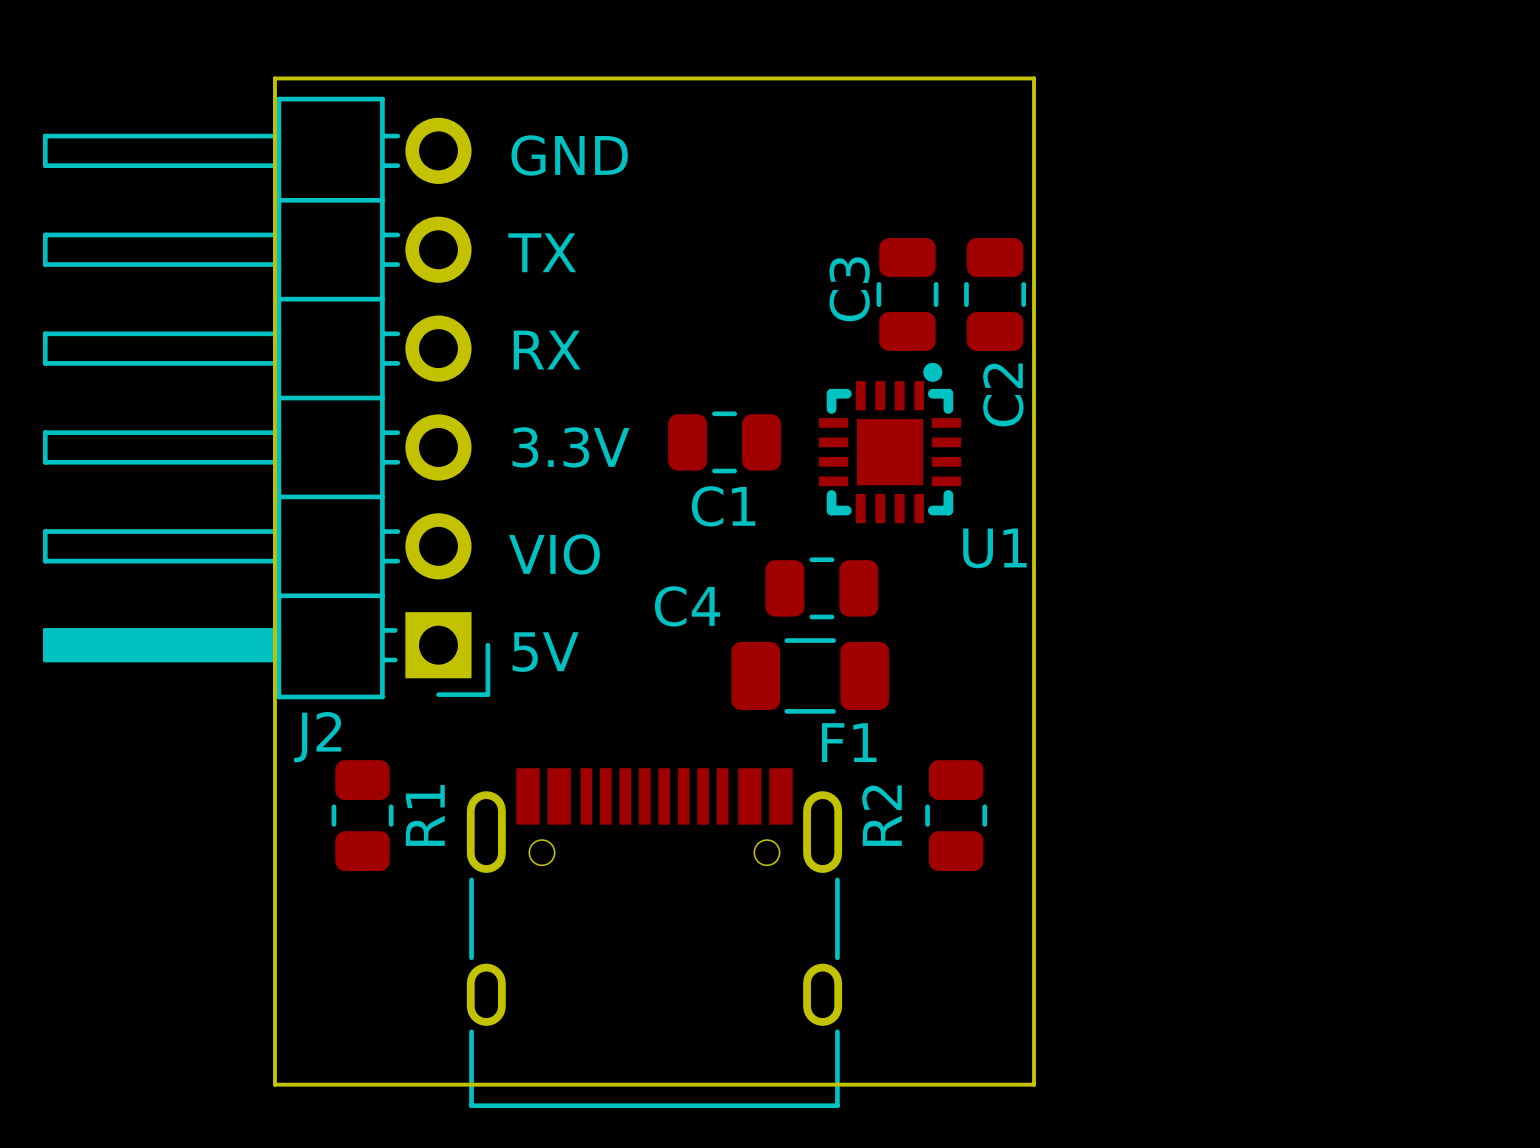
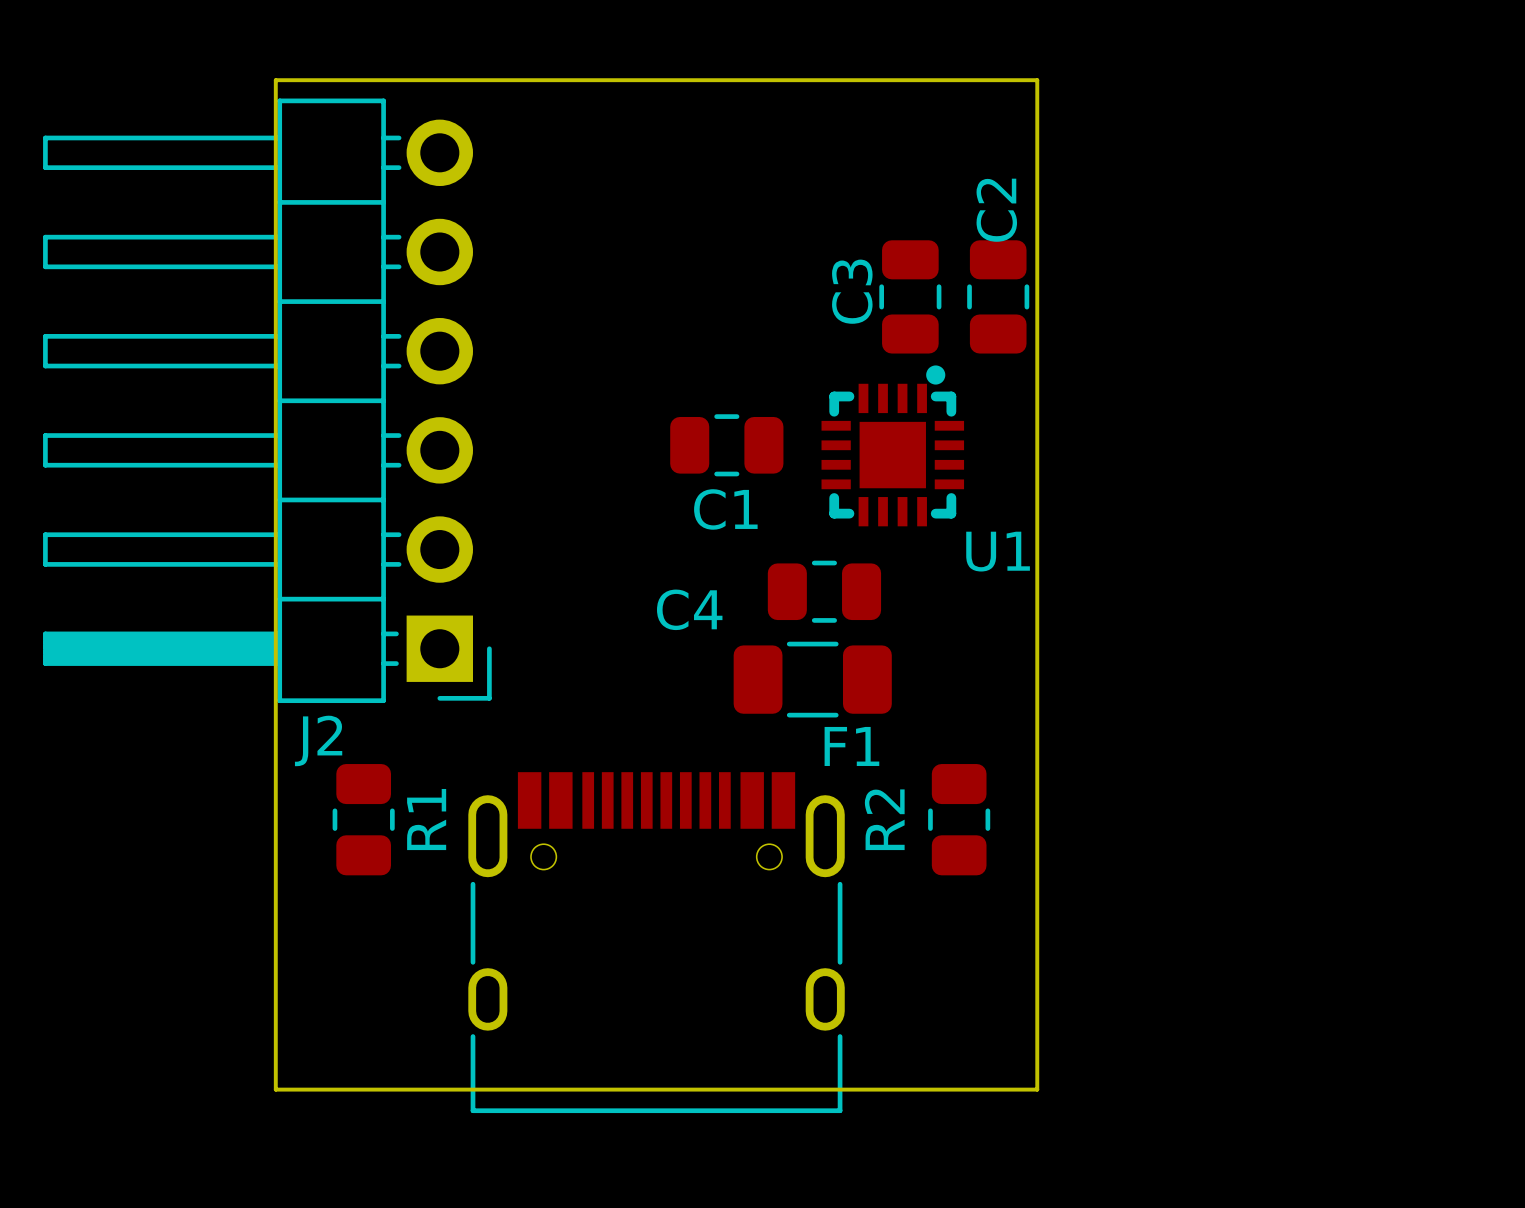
text: GND (569, 155) -> none
text: TX (542, 252) -> none
text: RX (547, 350) -> none
C2 name position: C2 (1003, 394) -> C2 (996, 210)
text: 3.3V (571, 447) -> none
text: VIO (554, 554) -> none
text: 5V (545, 652) -> none

